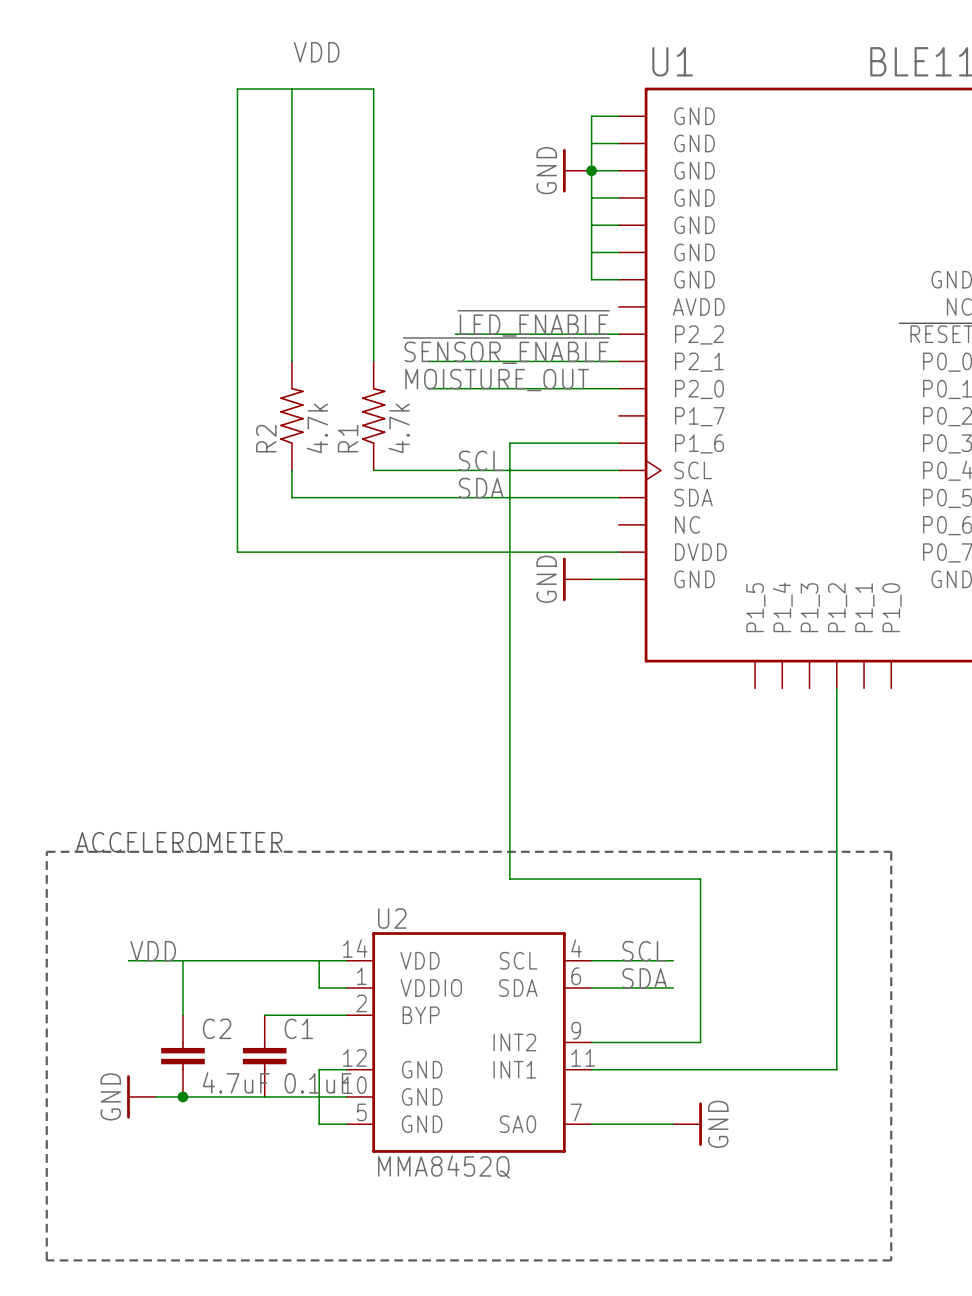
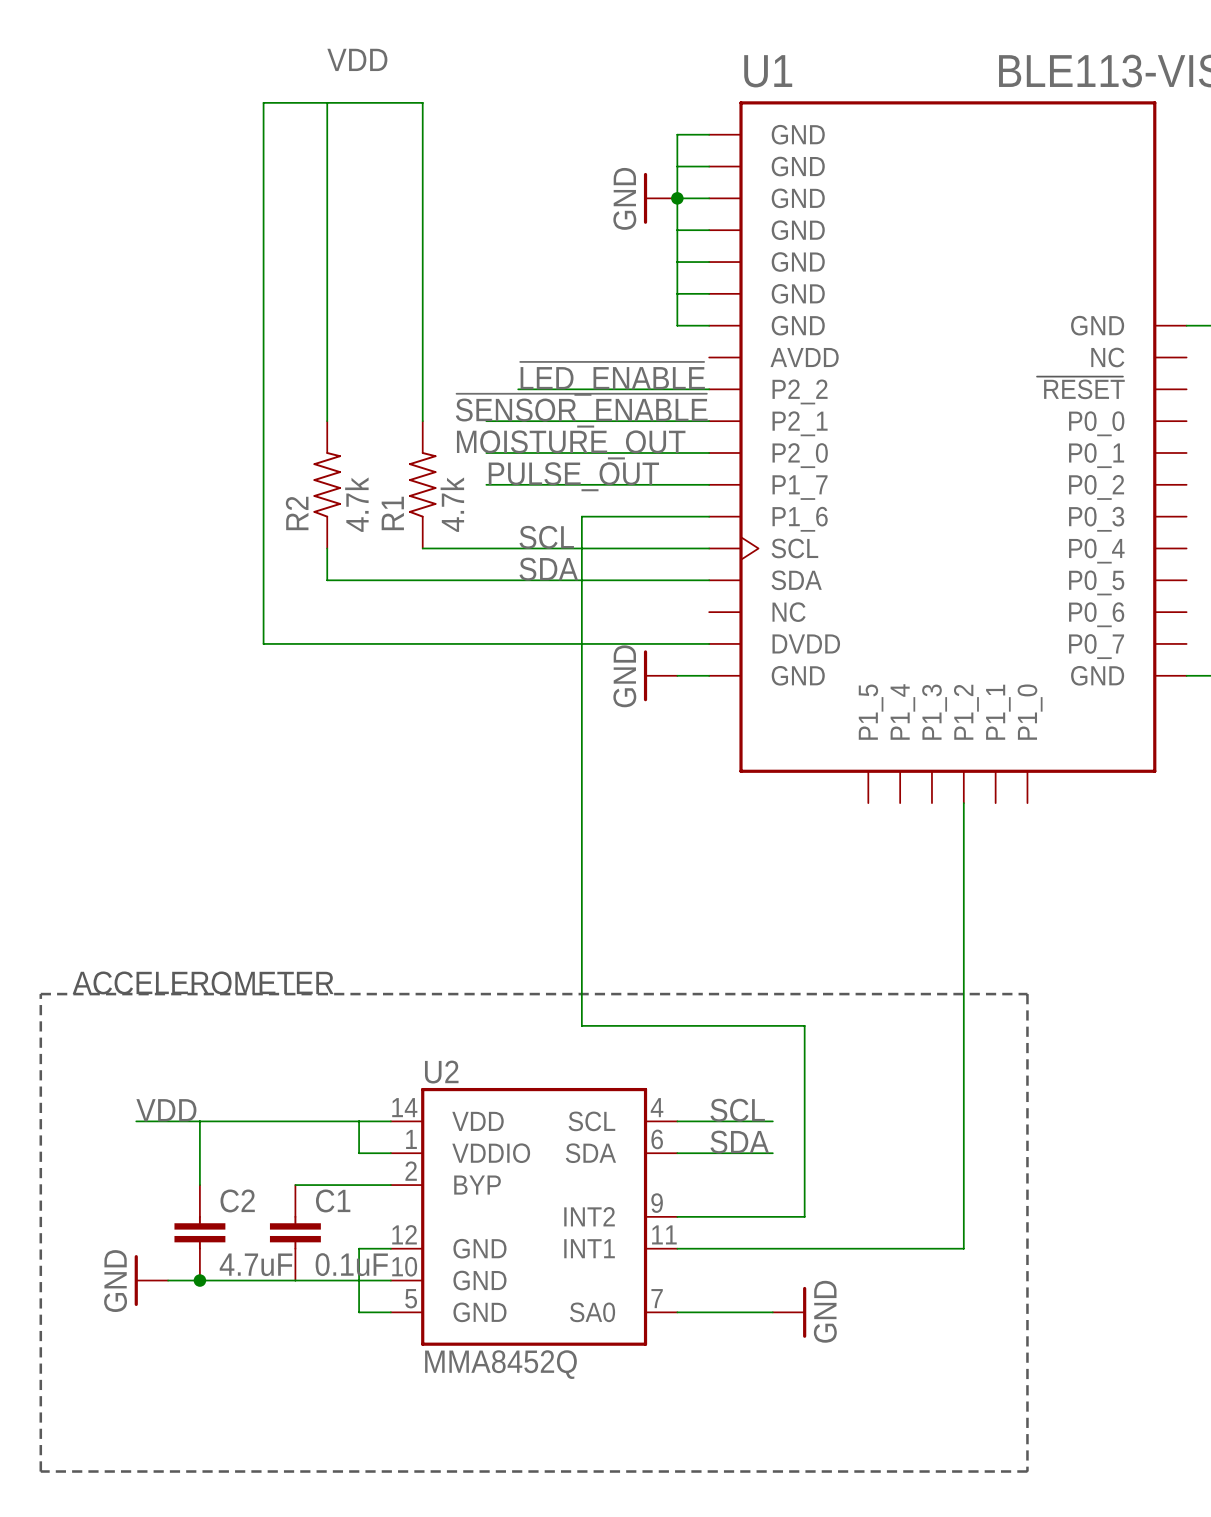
label: none -> PULSE_OUT (573, 476)
wire: none -> (486, 484) (709, 484)

